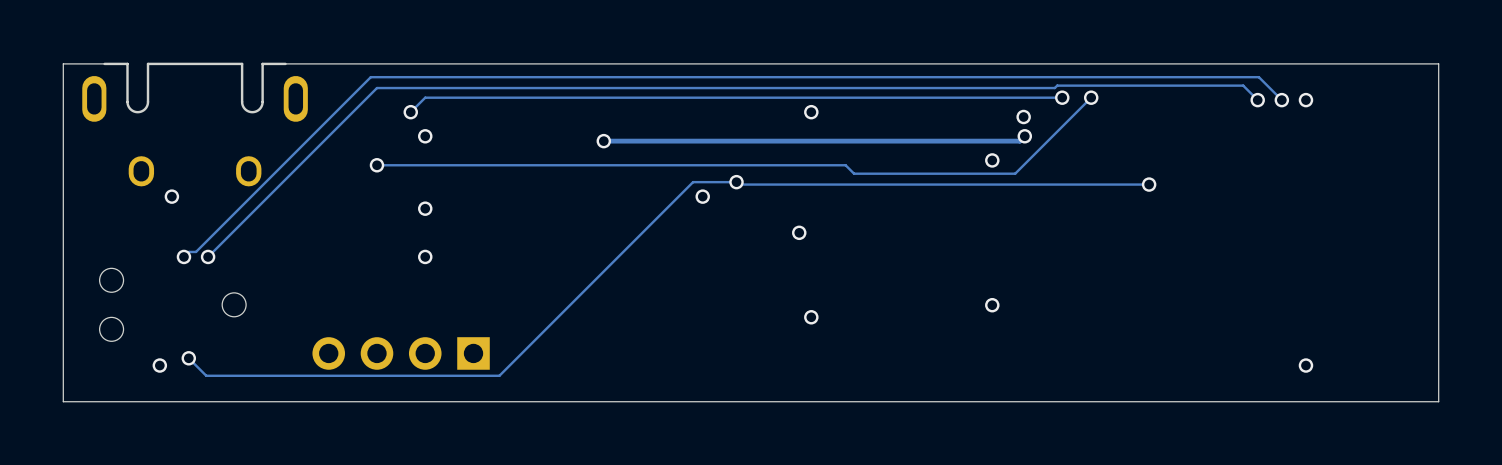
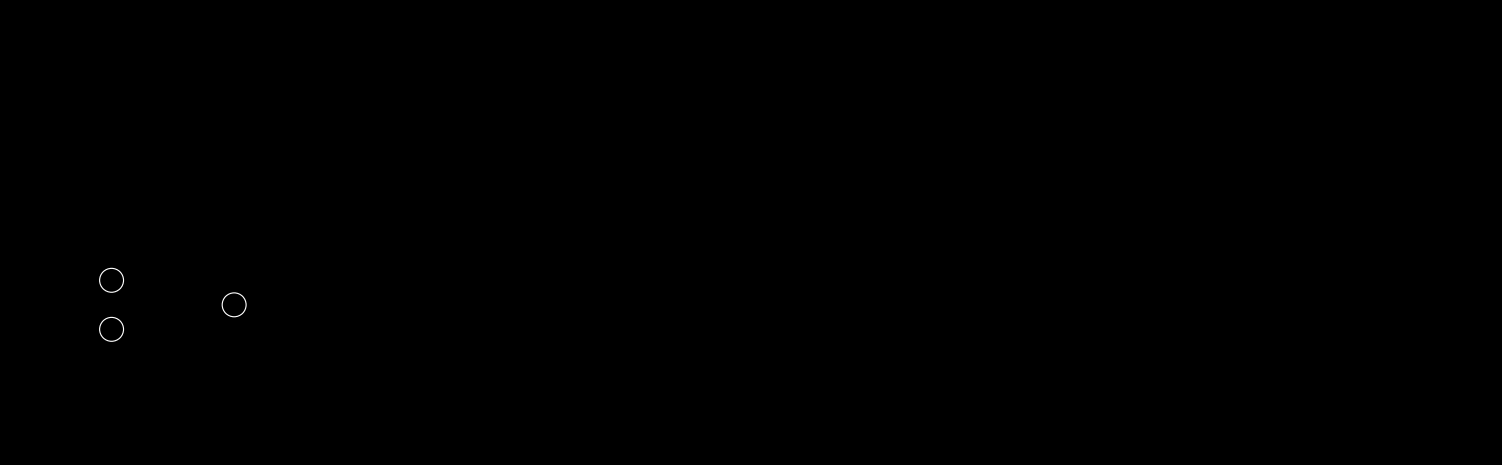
board edge: (285, 63) (1438, 63) (1438, 401) (63, 401) (63, 63) (104, 63) -> none
track: (1062, 97) (425, 97) (410, 112) -> none
via: (1062, 97) -> none
track: (1091, 97) (1015, 173) (854, 173) (845, 165) (376, 165) -> none
via: (1091, 97) -> none
track: (1257, 100) (1243, 85) (1057, 85) (1054, 88) (376, 88) (208, 256) -> none
via: (1257, 100) -> none
track: (1281, 100) (1258, 77) (370, 77) (196, 251) (188, 251) (183, 256) (188, 256) -> none
via: (1281, 100) -> none
via: (1305, 100) -> none
via: (410, 112) -> none
via: (811, 112) -> none
via: (1023, 117) -> none
part: (195, 124) -> none
via: (425, 136) -> none
track: (1024, 136) (1019, 141) (603, 141) -> none
via: (1024, 136) -> none
via: (603, 141) -> none
via: (992, 160) -> none
via: (376, 165) -> none
via: (736, 182) -> none
track: (1149, 184) (738, 184) (736, 182) (693, 182) (499, 375) (206, 375) (188, 358) -> none
via: (1149, 184) -> none
via: (171, 196) -> none
via: (702, 196) -> none
via: (425, 208) -> none
via: (799, 232) -> none
via: (183, 256) -> none
via: (208, 256) -> none
via: (425, 256) -> none
via: (992, 305) -> none
via: (811, 317) -> none
part: (401, 353) -> none
via: (188, 358) -> none
via: (159, 365) -> none
via: (1305, 365) -> none

